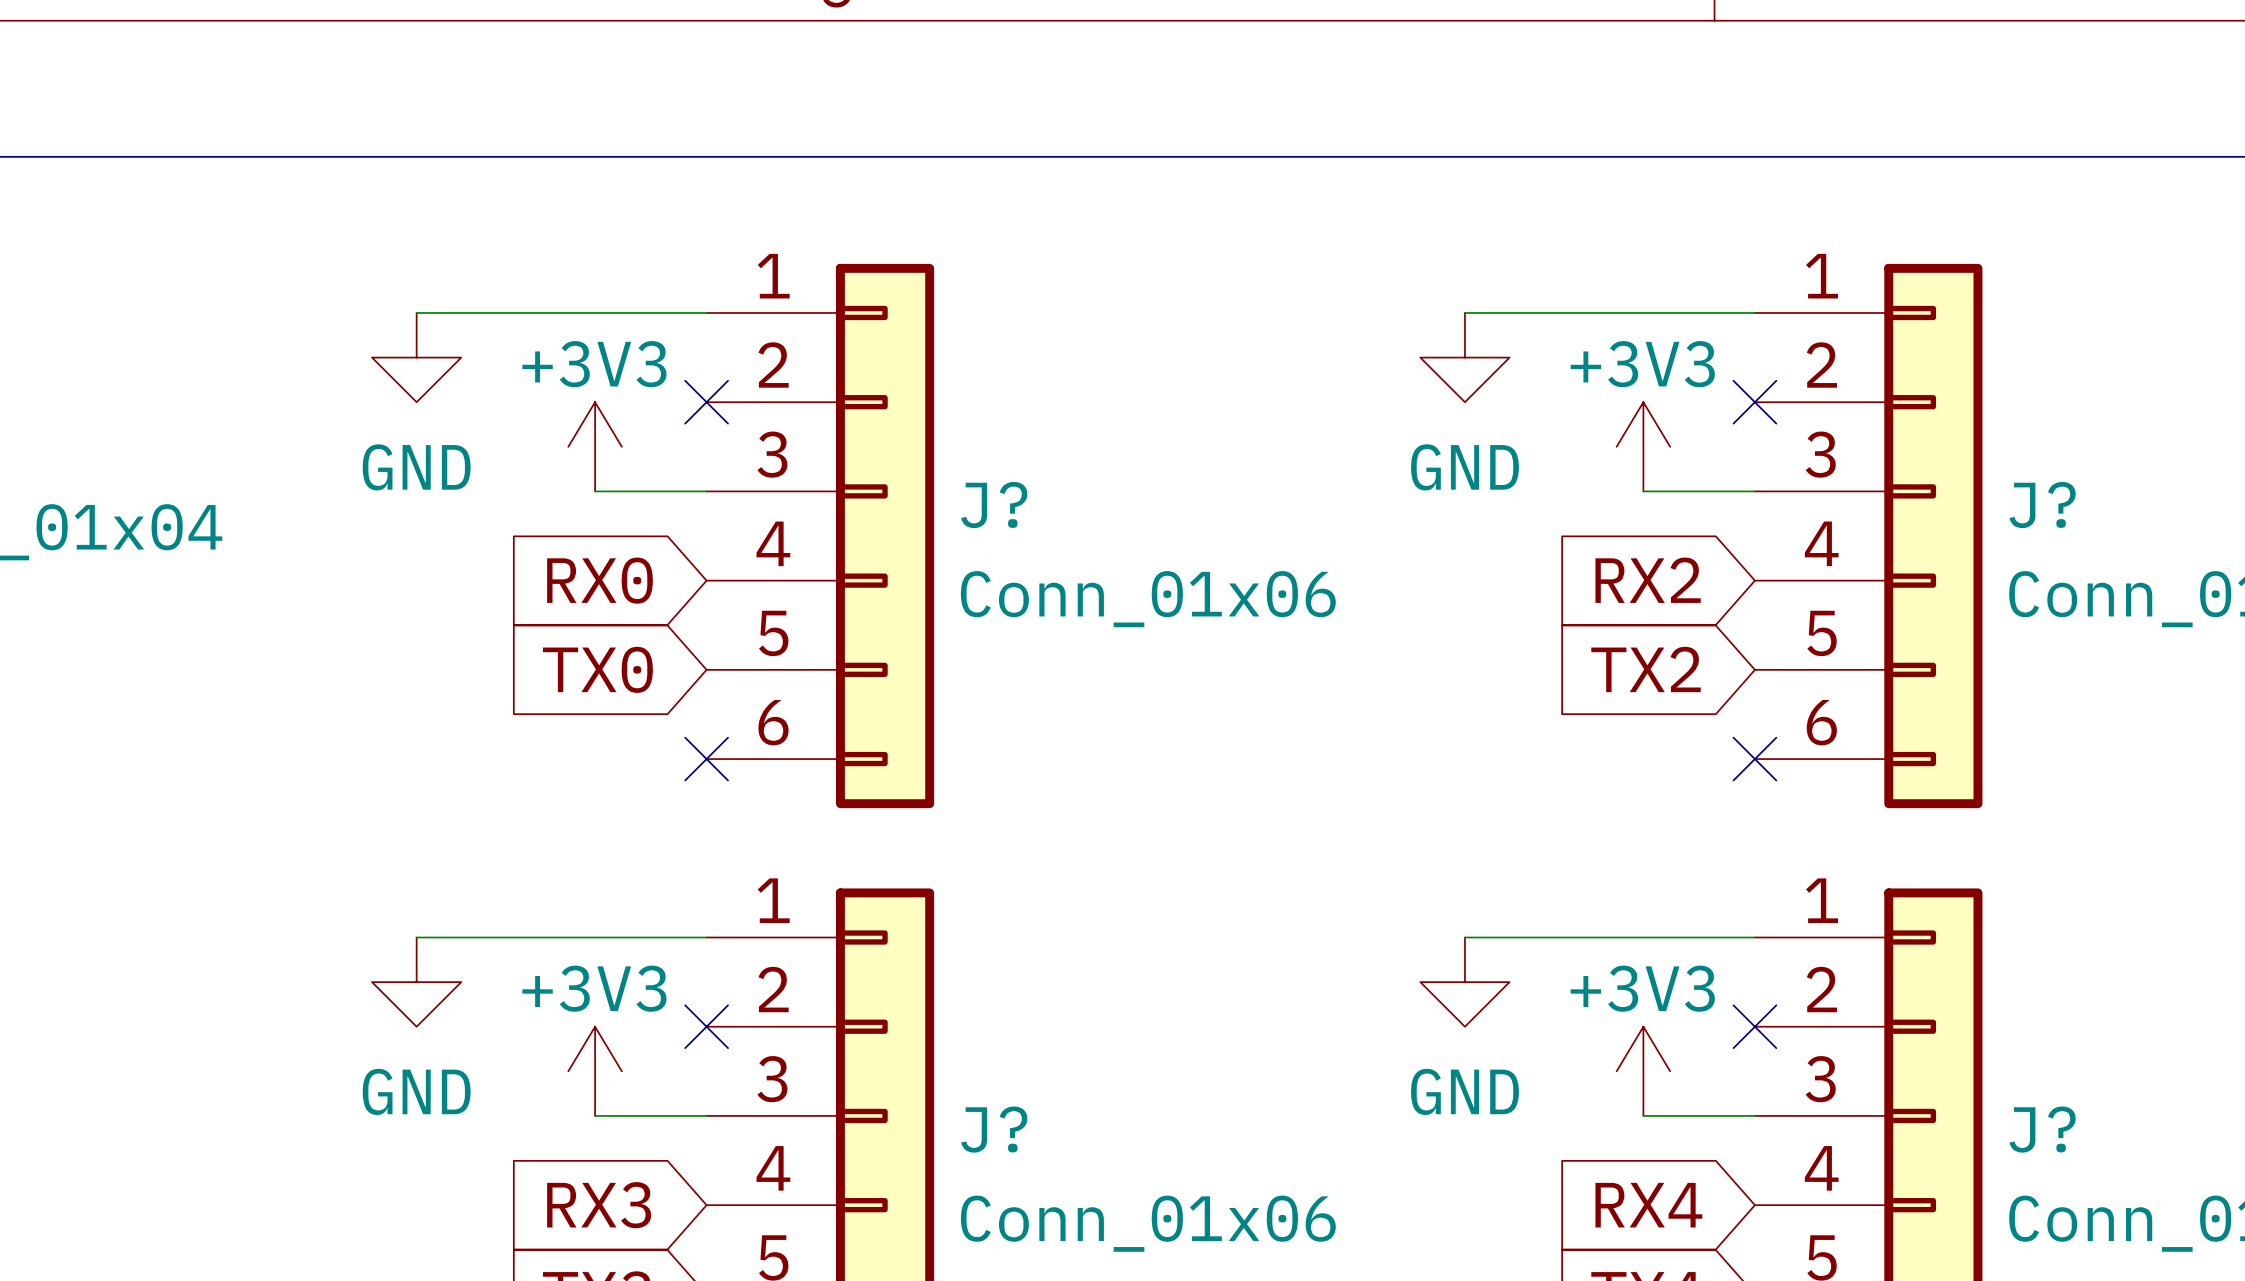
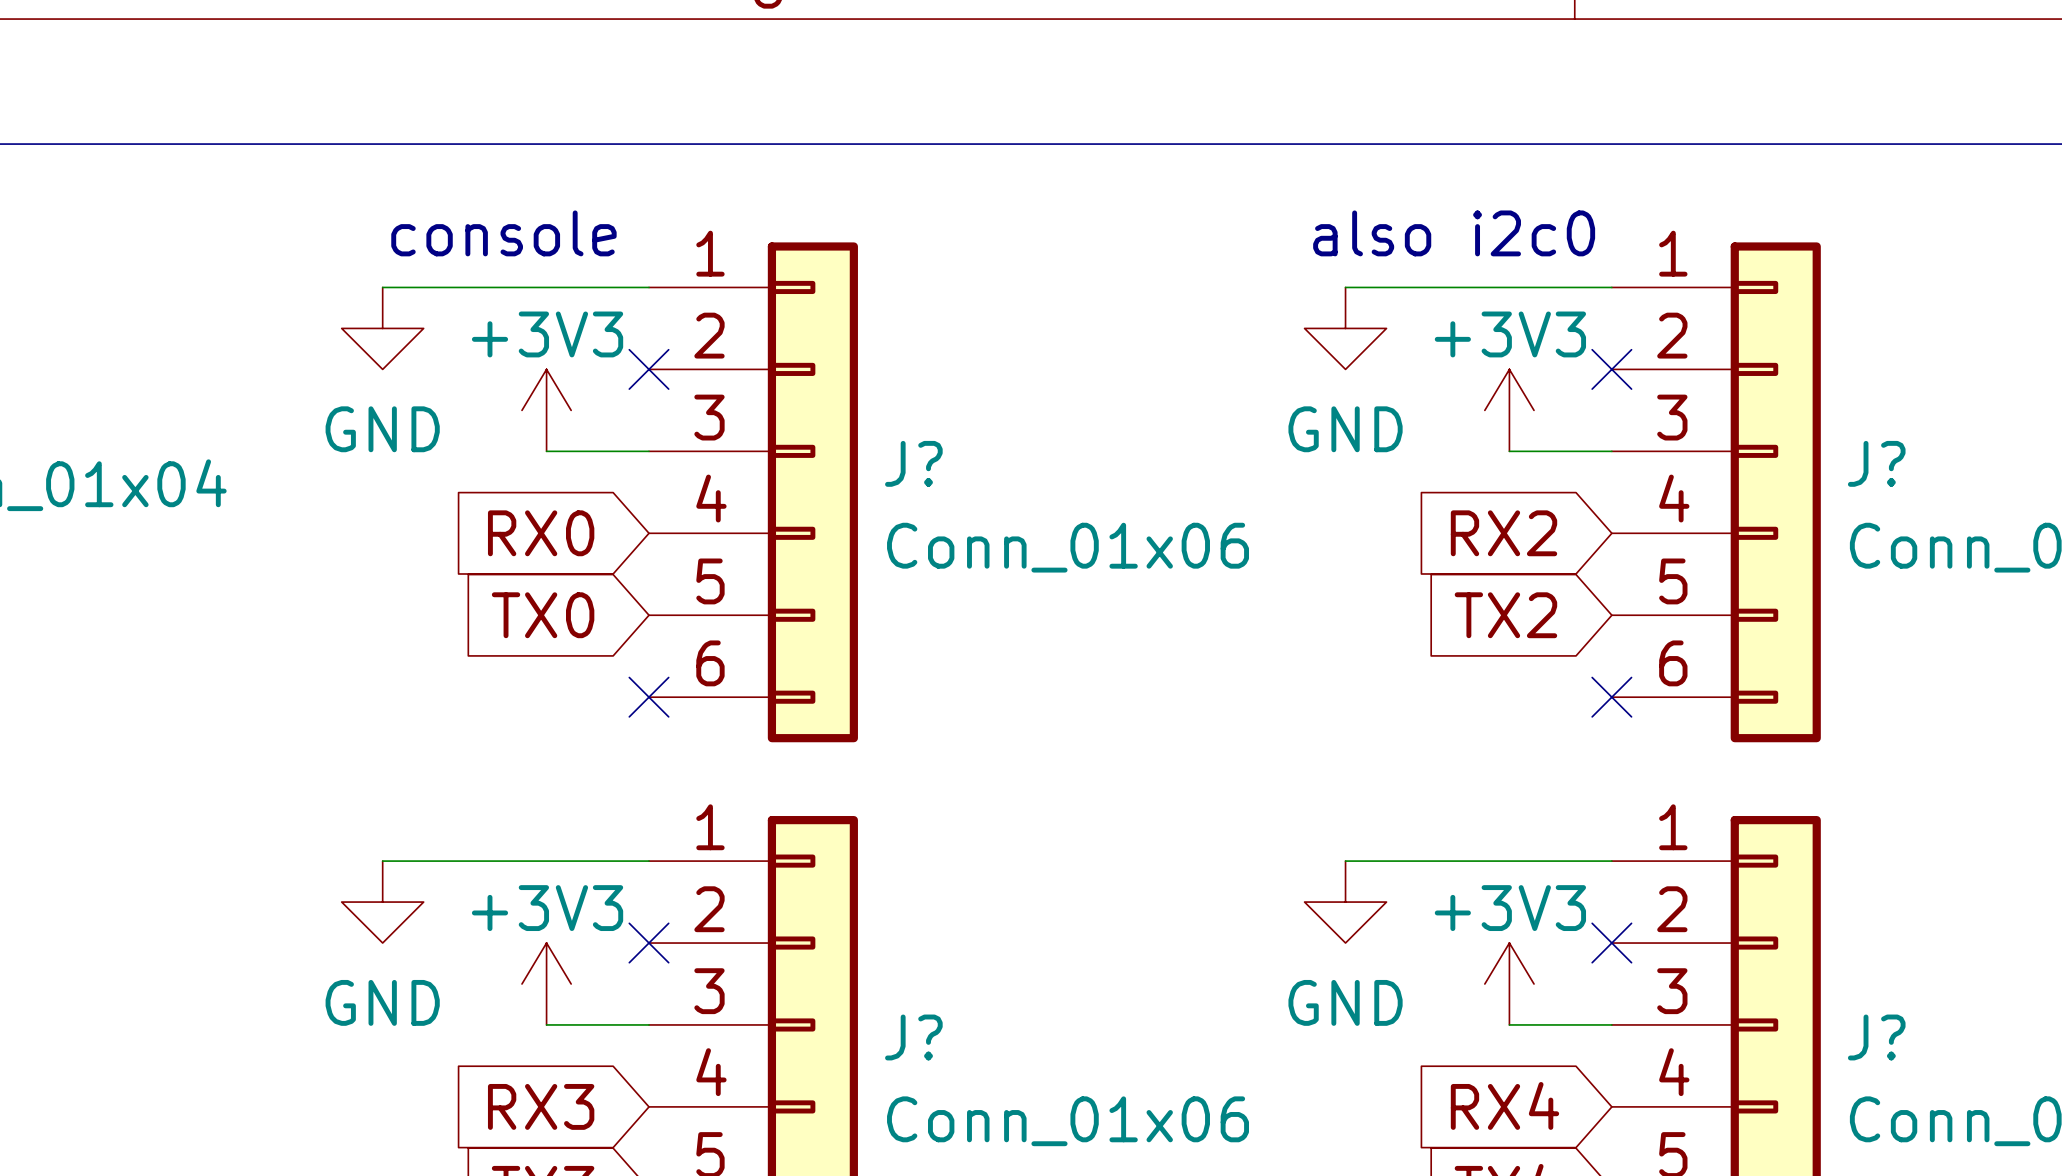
text: none -> also i2c0 (1454, 233)
text: none -> console (503, 233)

